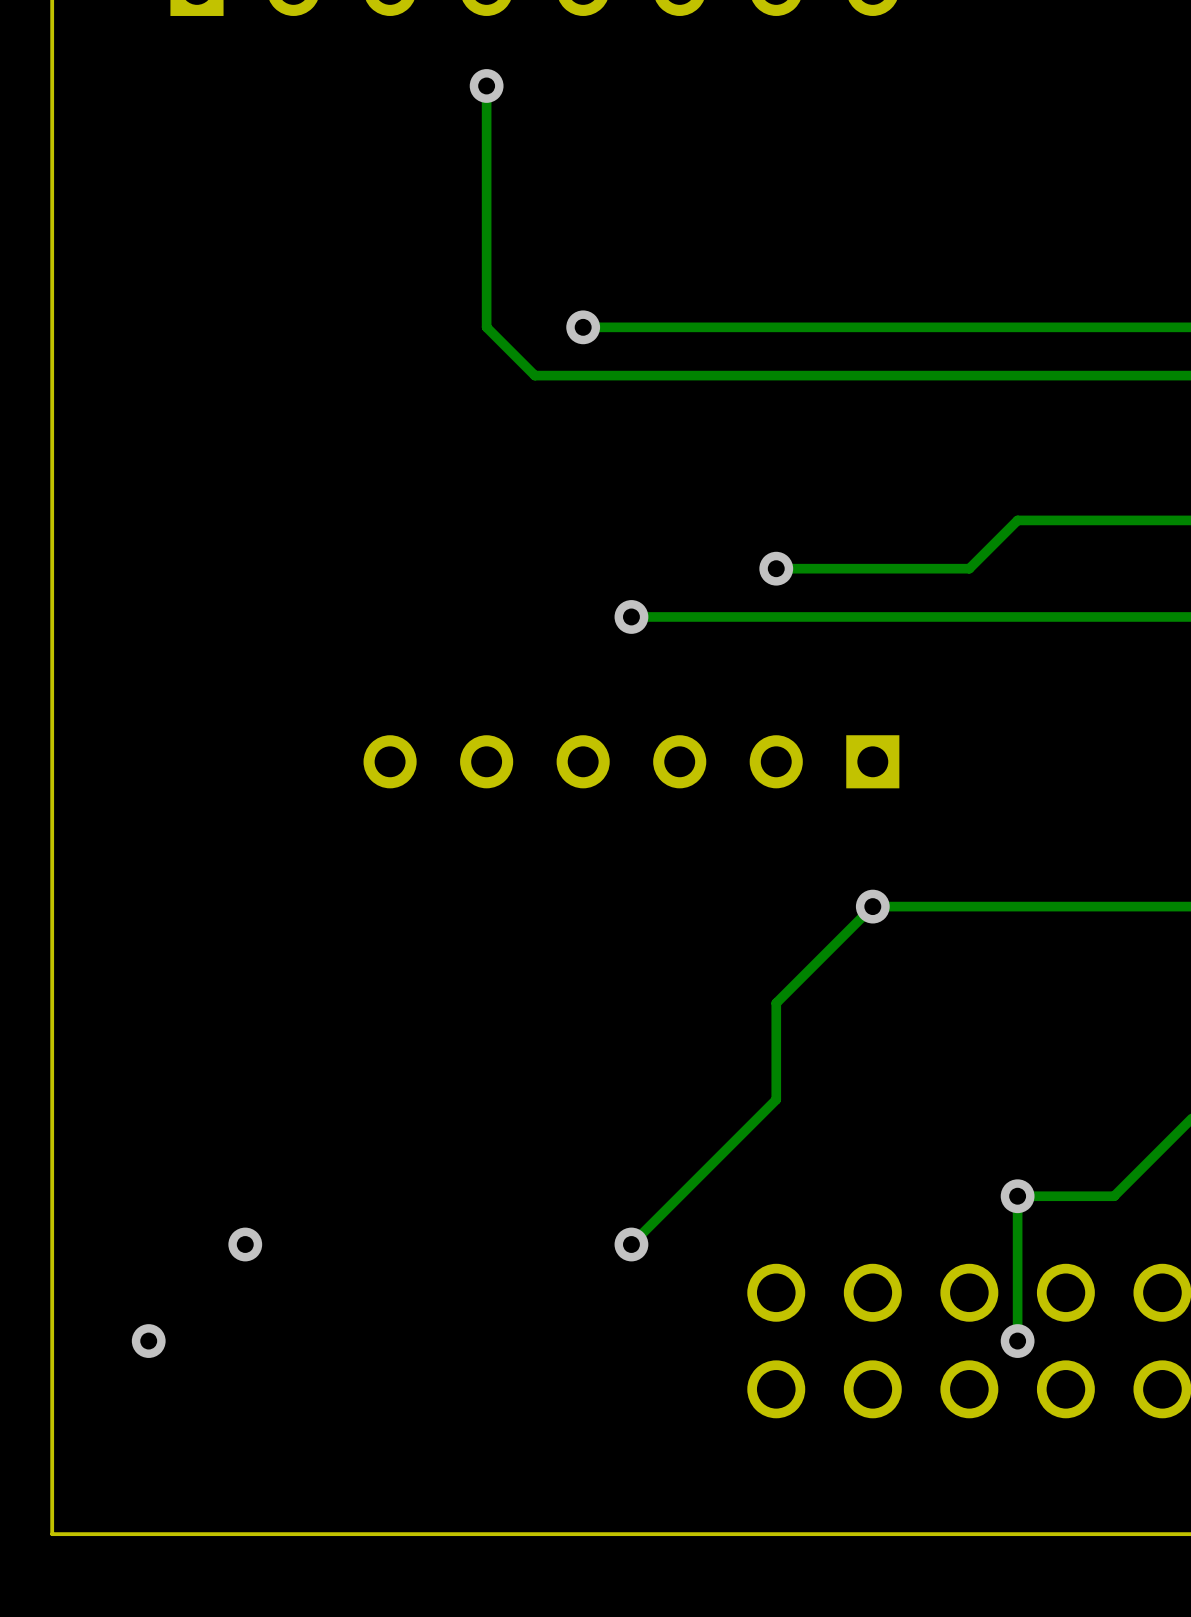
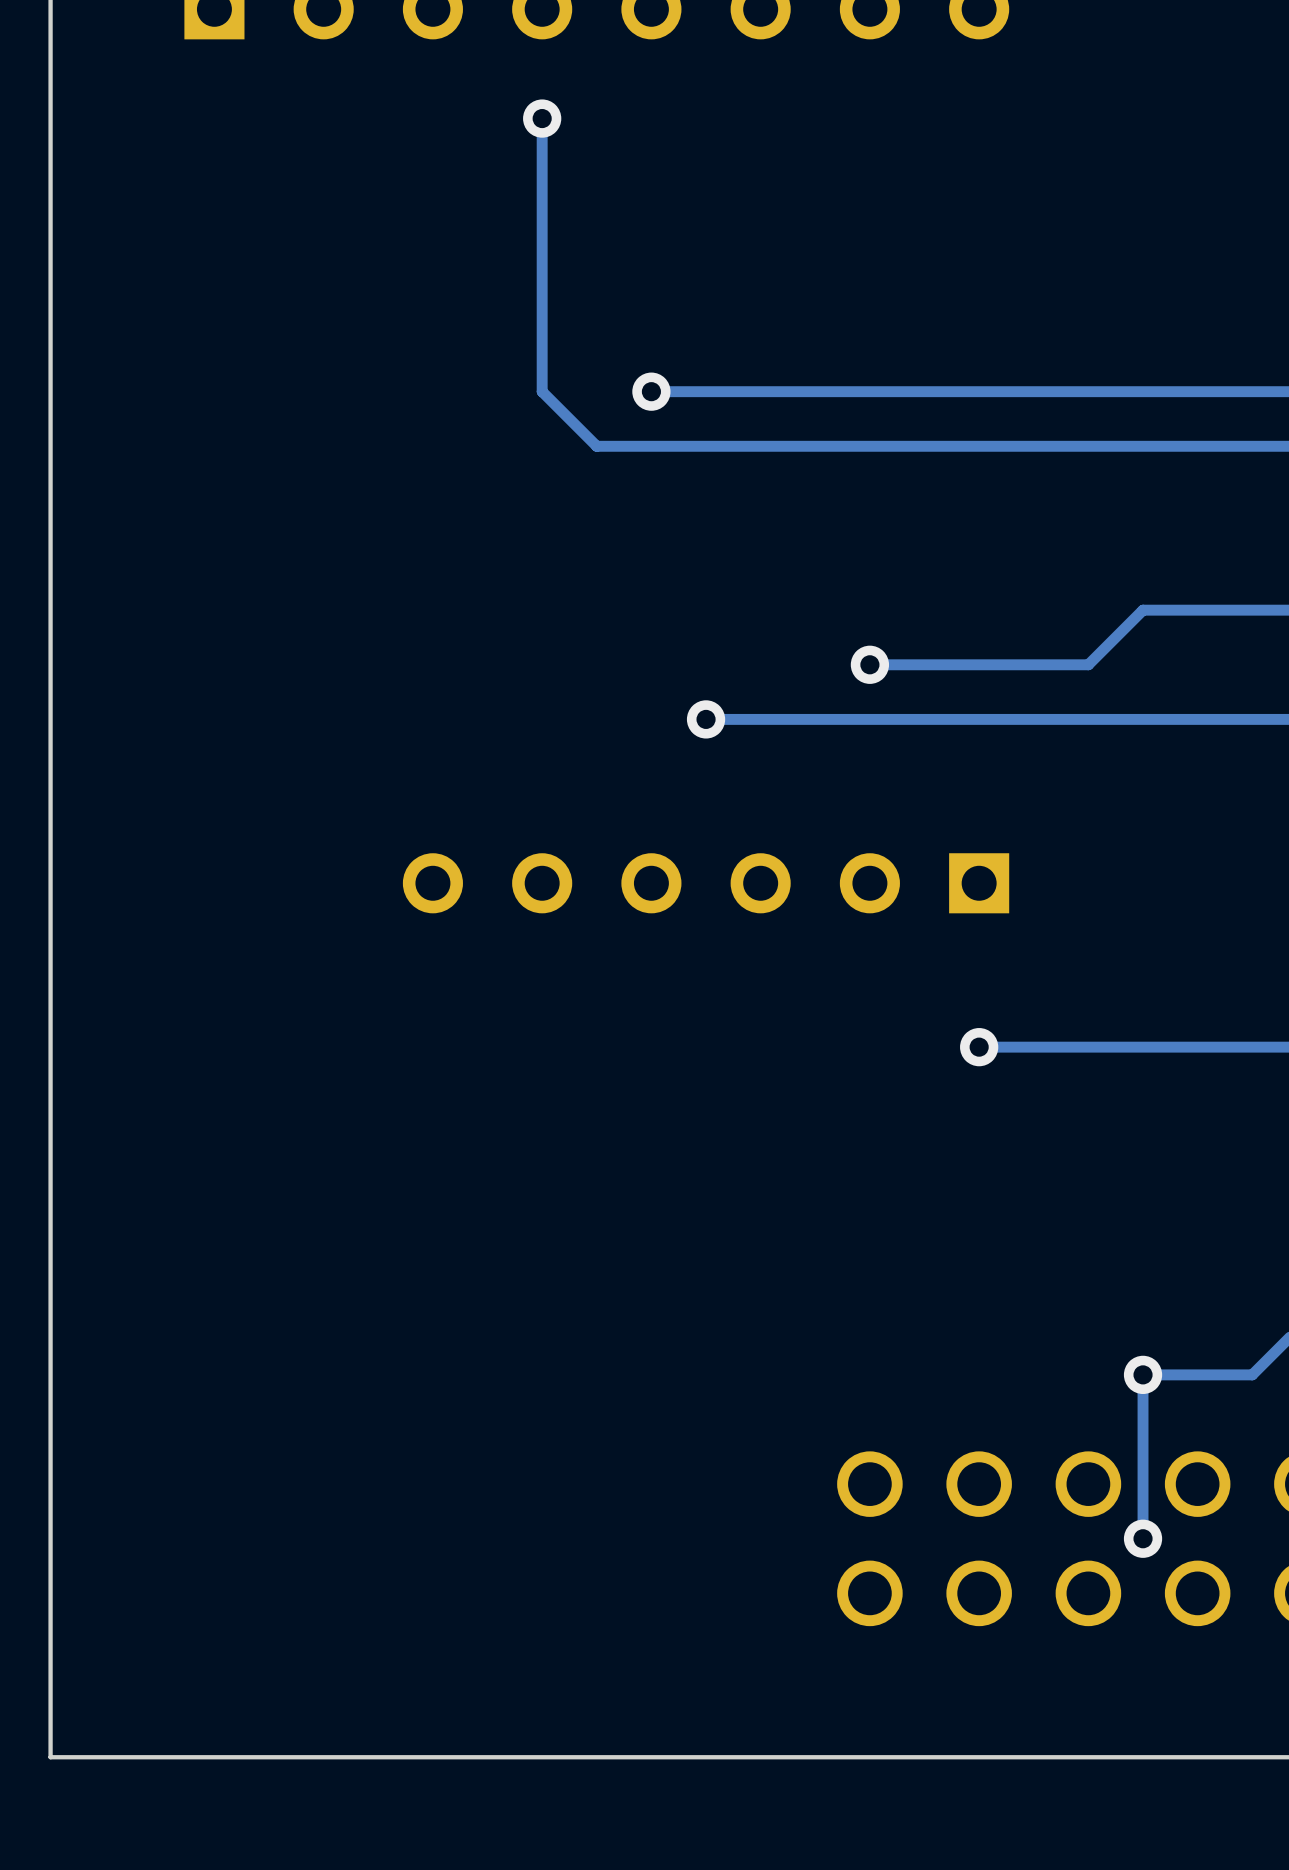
track: (872, 906) (776, 1003) (776, 1099) (631, 1244) -> none
via: (245, 1244) -> none
via: (631, 1244) -> none
via: (148, 1341) -> none

